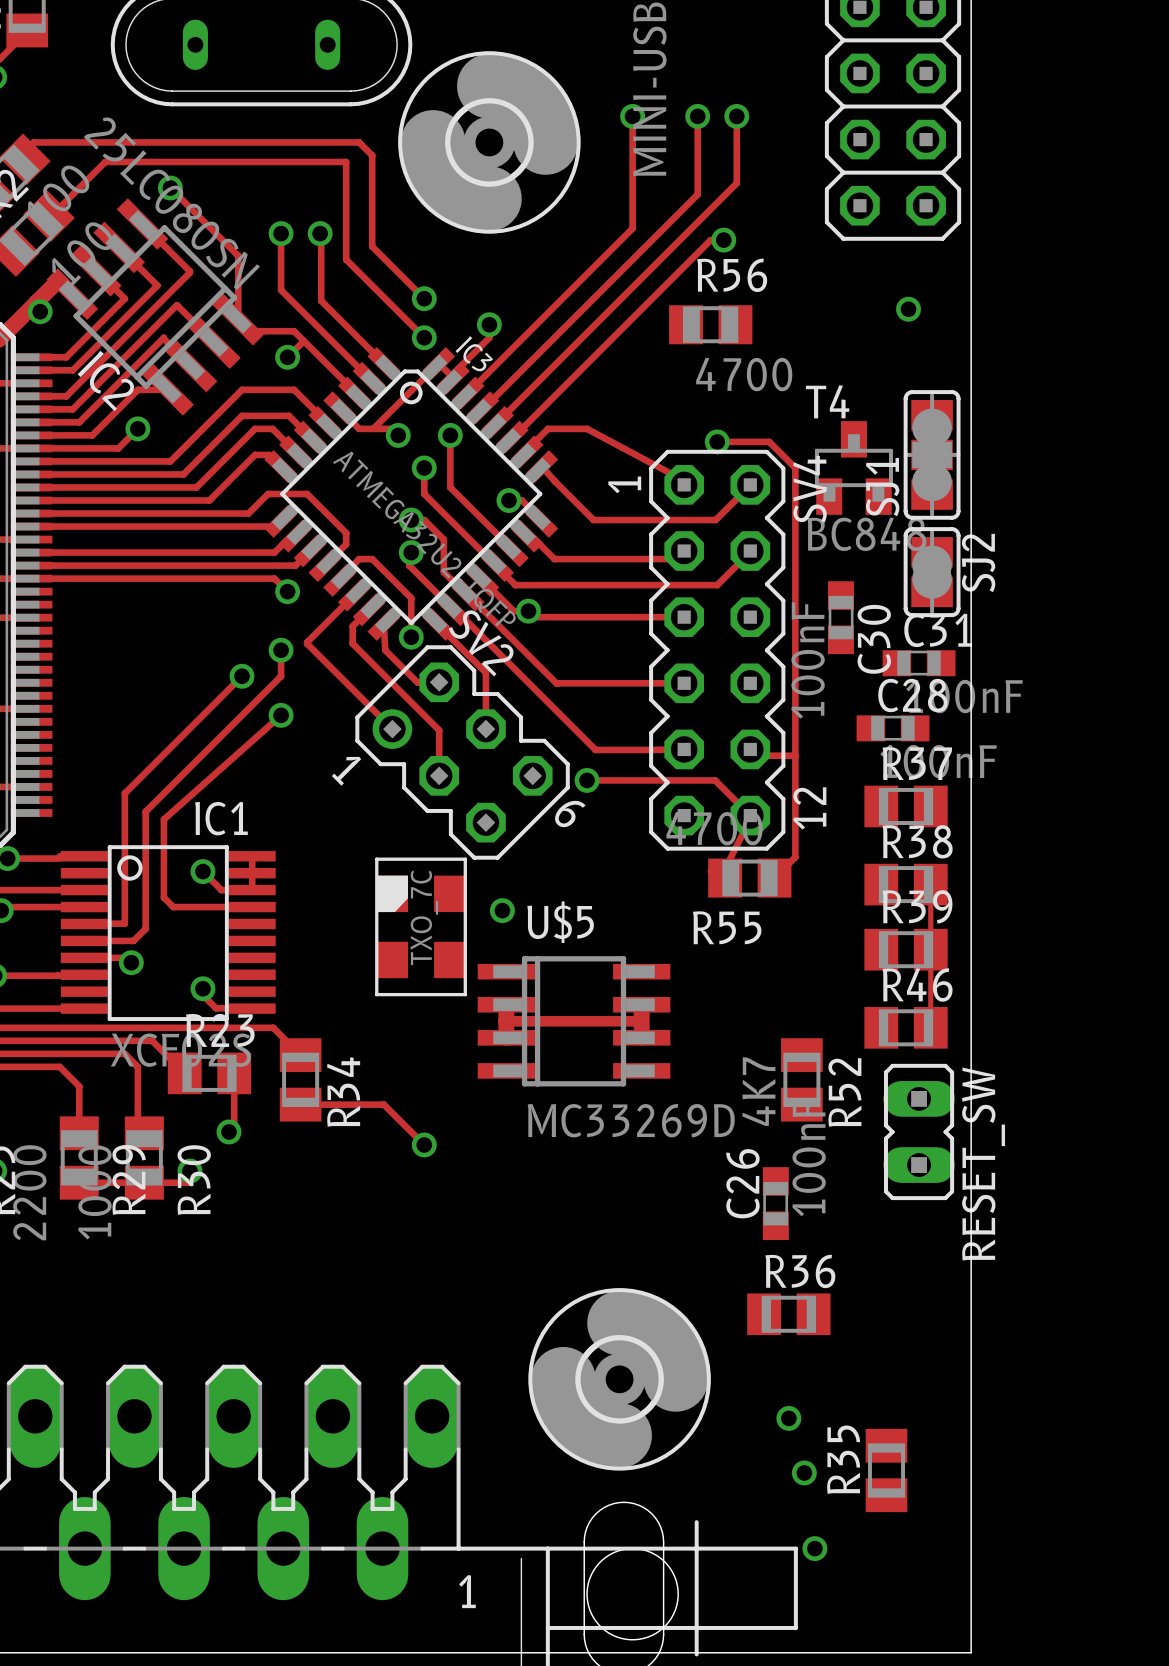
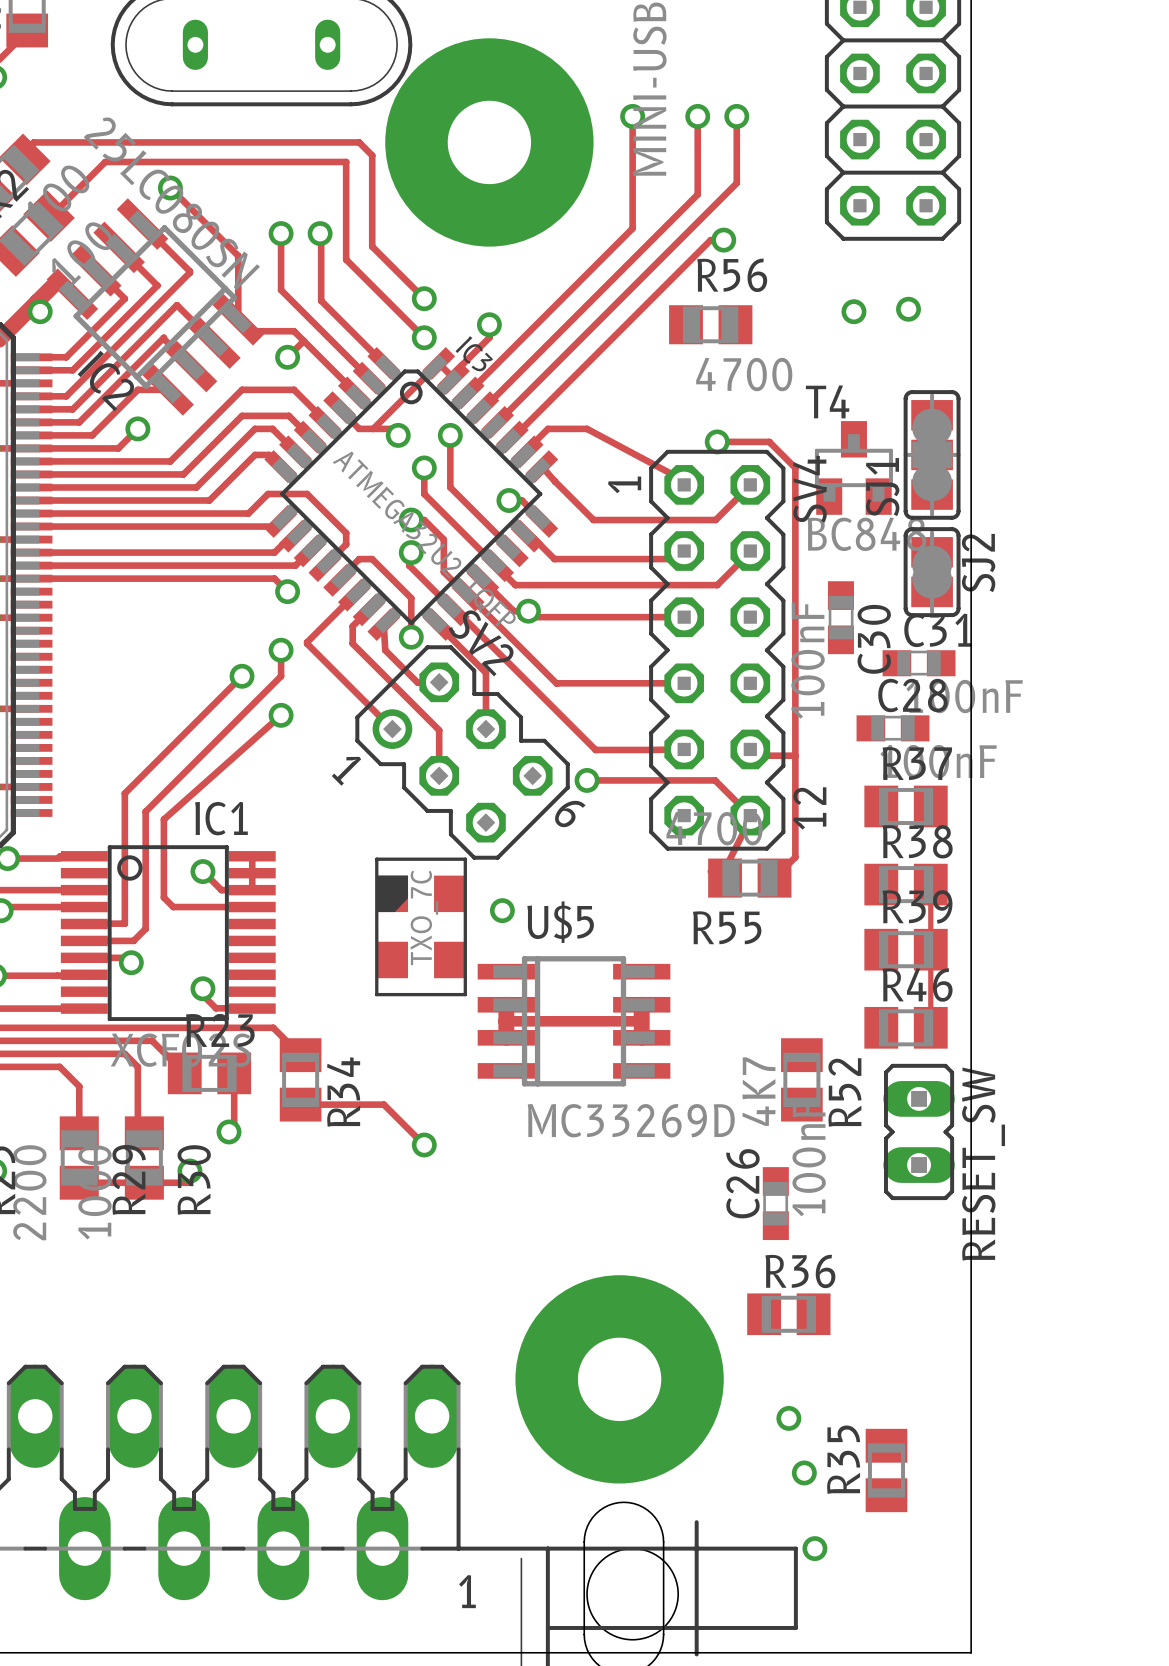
part footprint: [398, 51, 581, 234] -> [385, 38, 594, 247]
via: none -> (853, 311)
part footprint: [528, 1288, 711, 1471] -> [515, 1275, 724, 1484]

